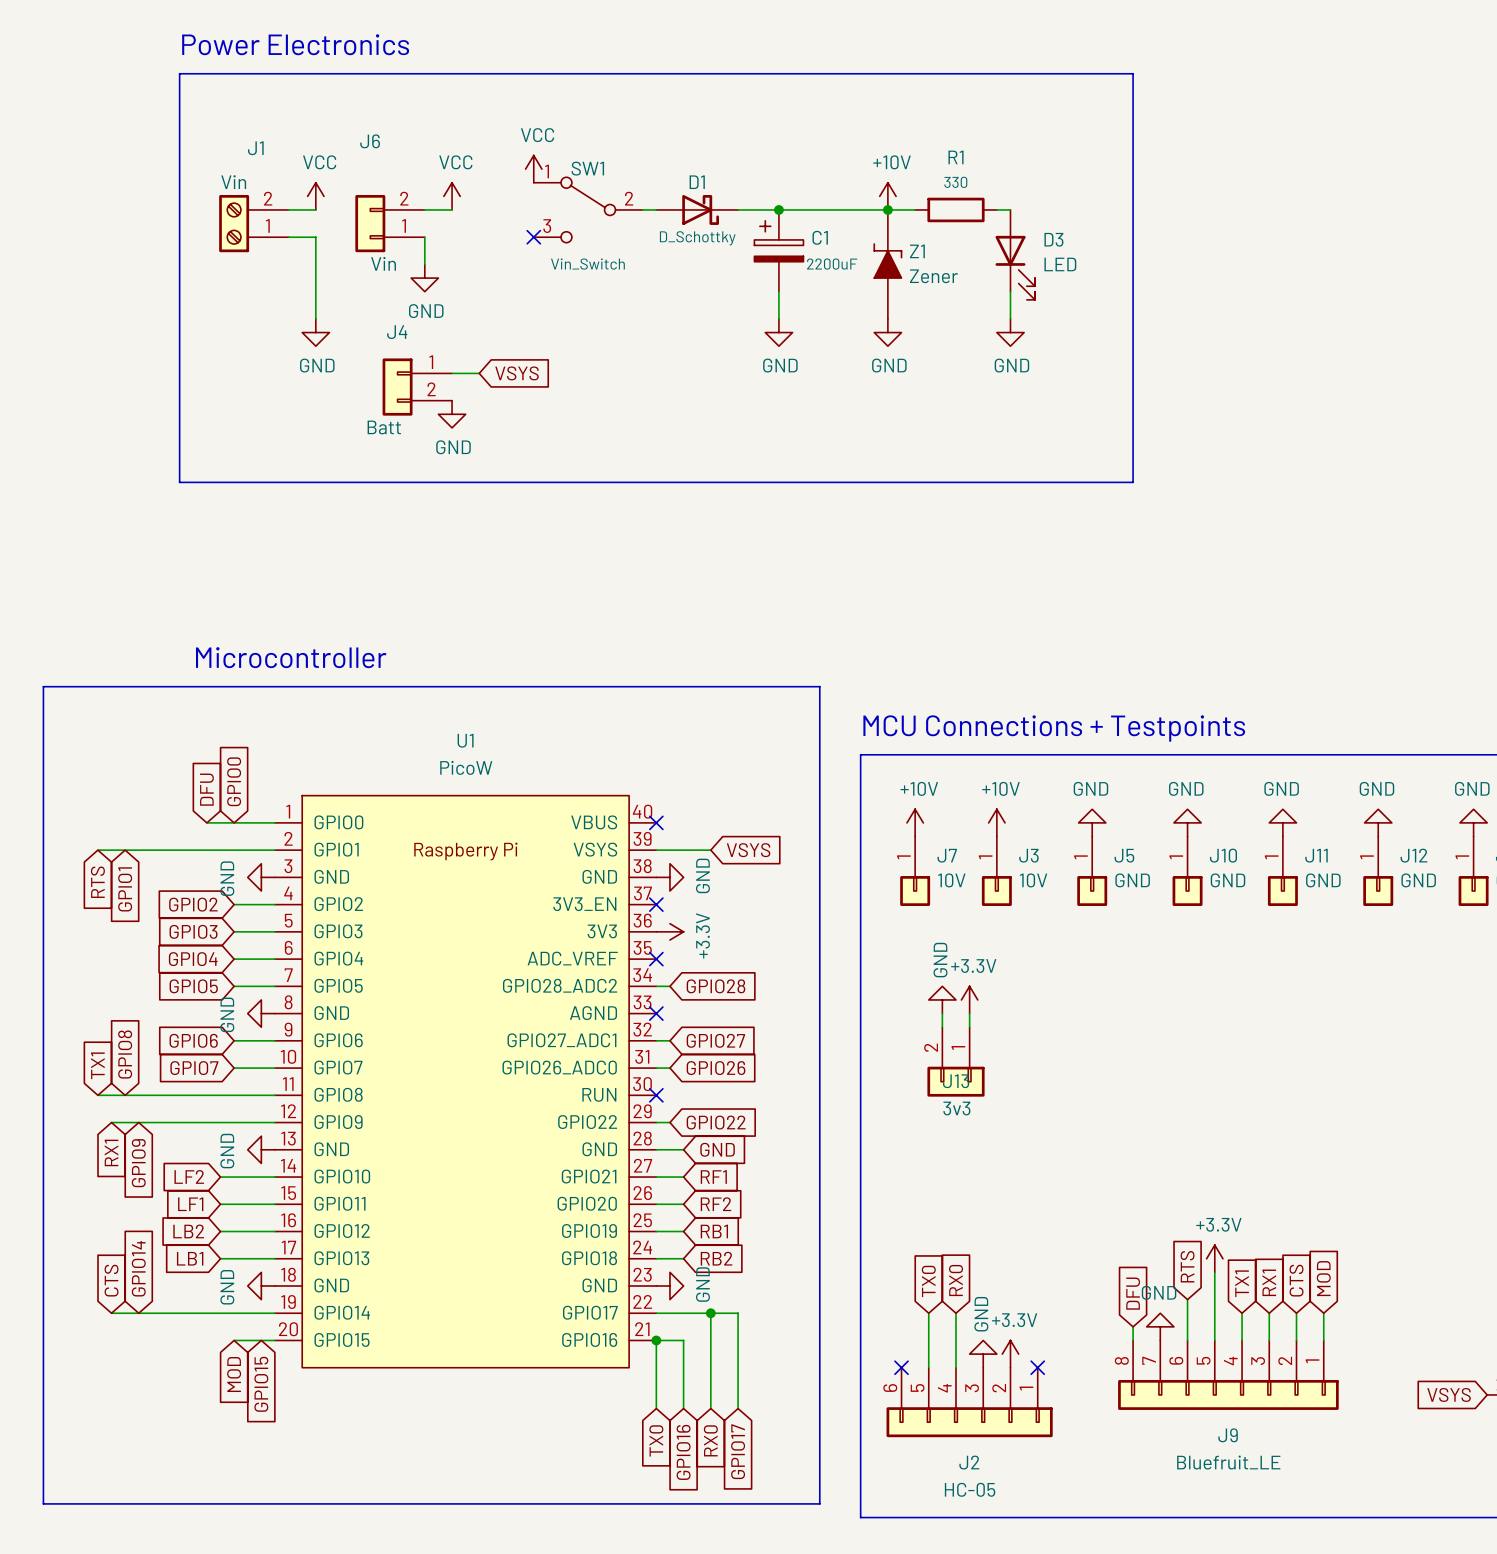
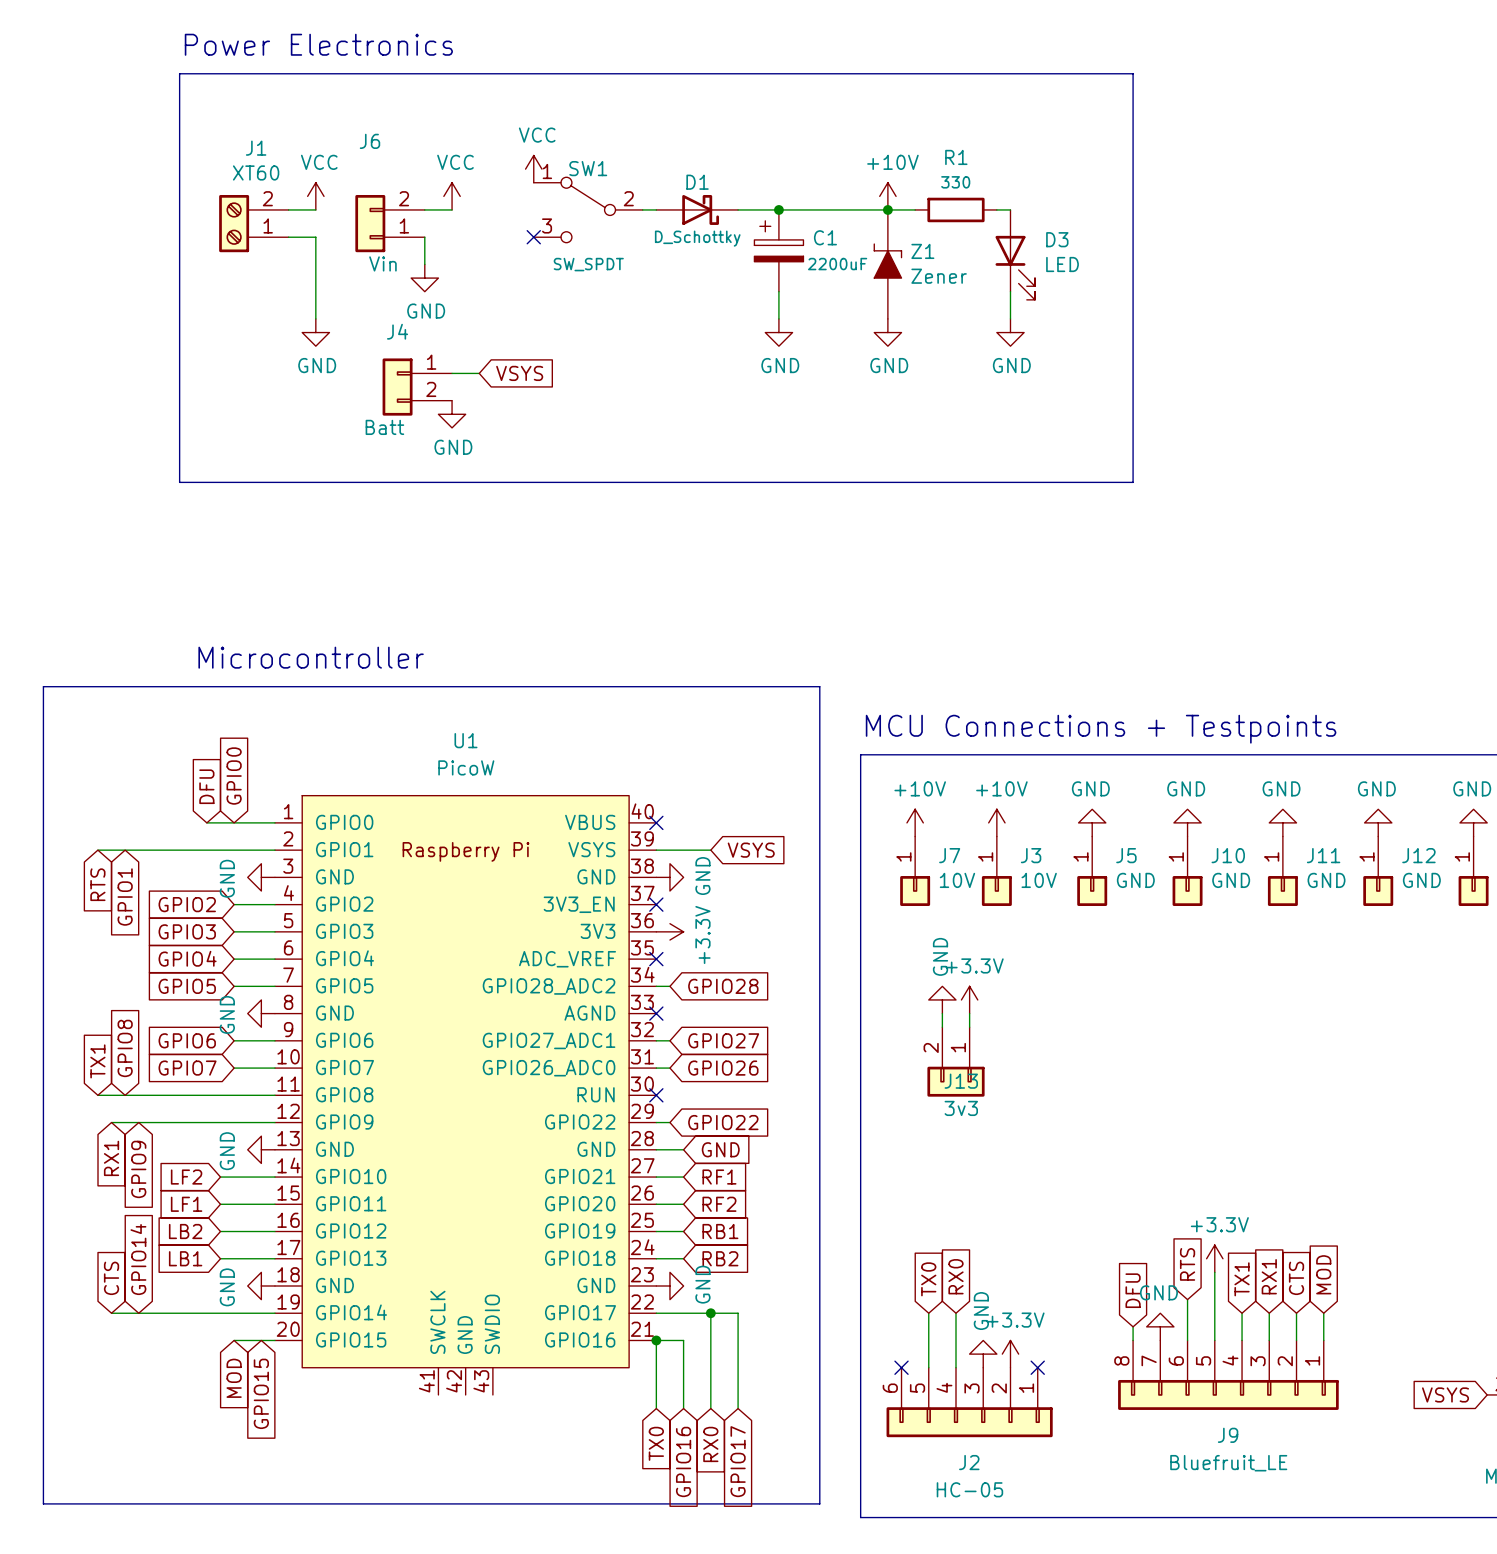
J1 value: Vin (233, 182) -> XT60 (256, 172)
SW1 value: Vin_Switch (587, 264) -> SW_SPDT (588, 264)
U1 symbol: [274, 795, 657, 1368] -> [274, 795, 657, 1395]

